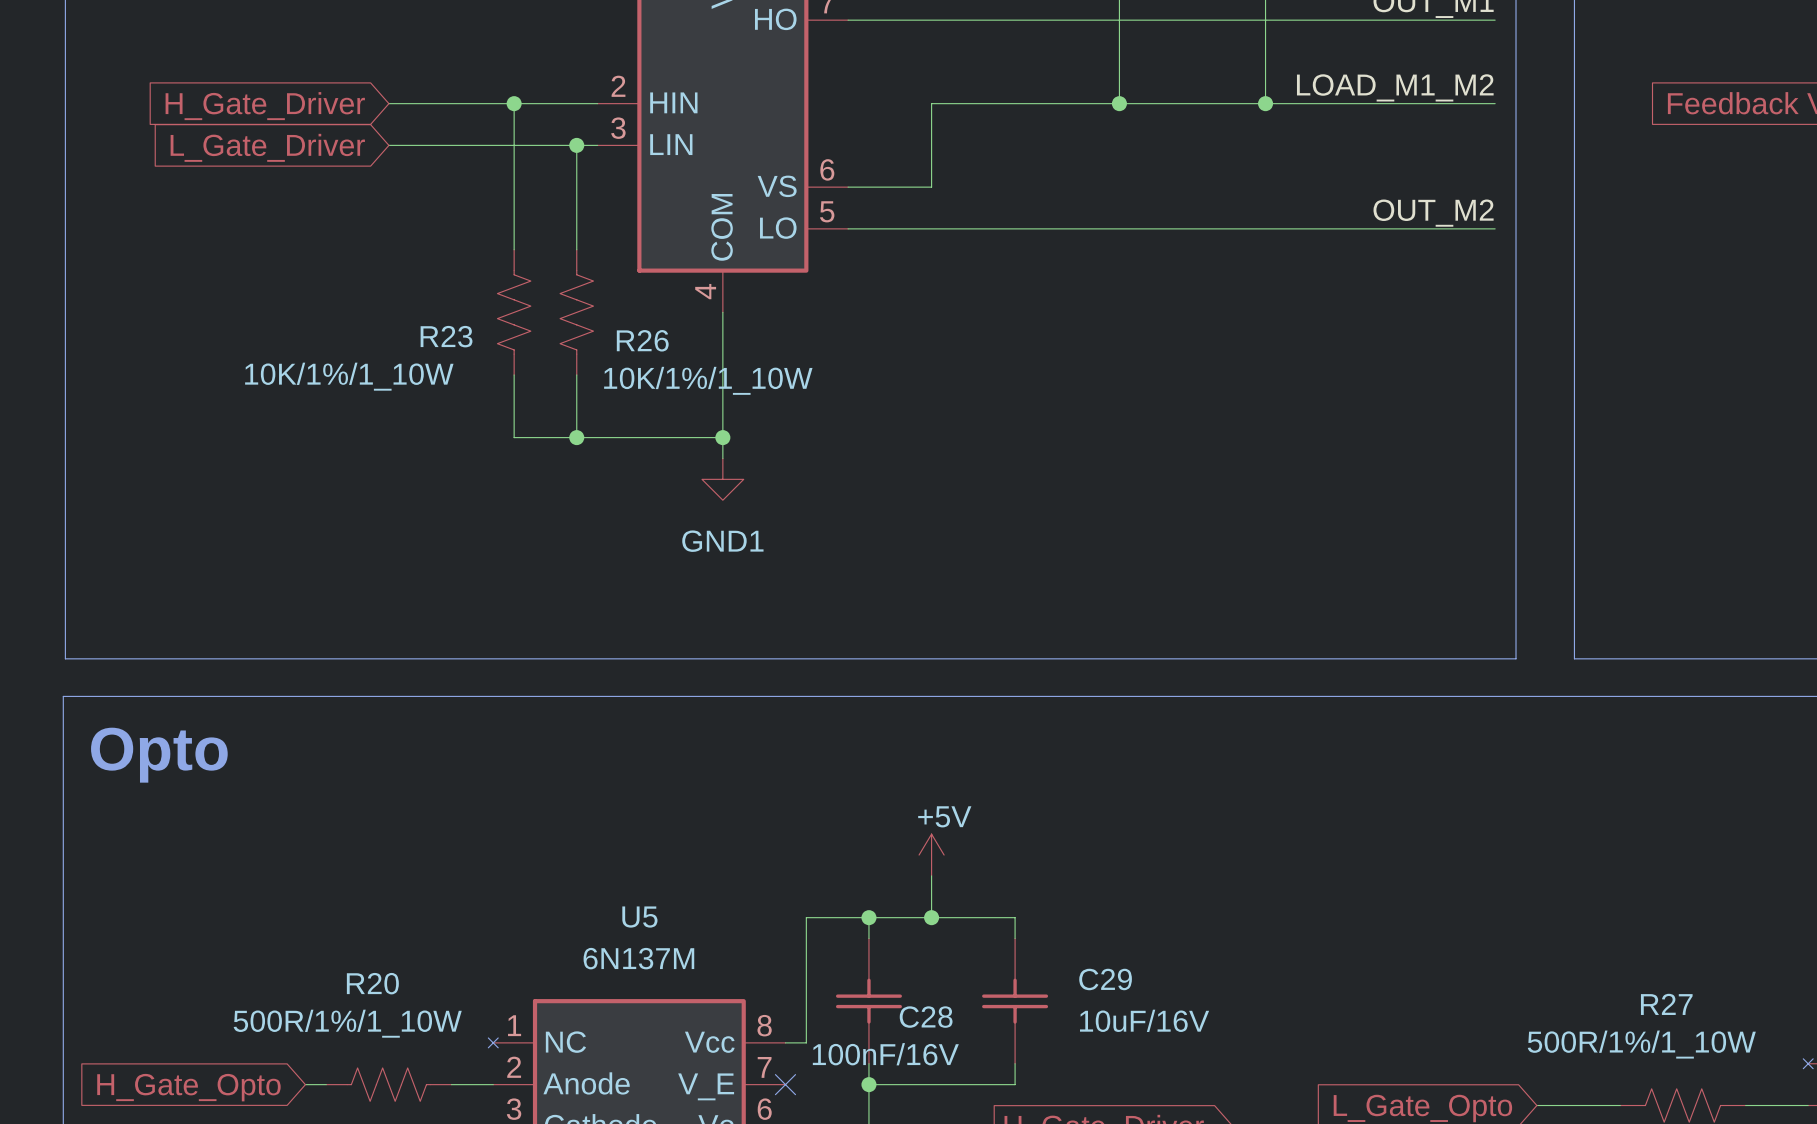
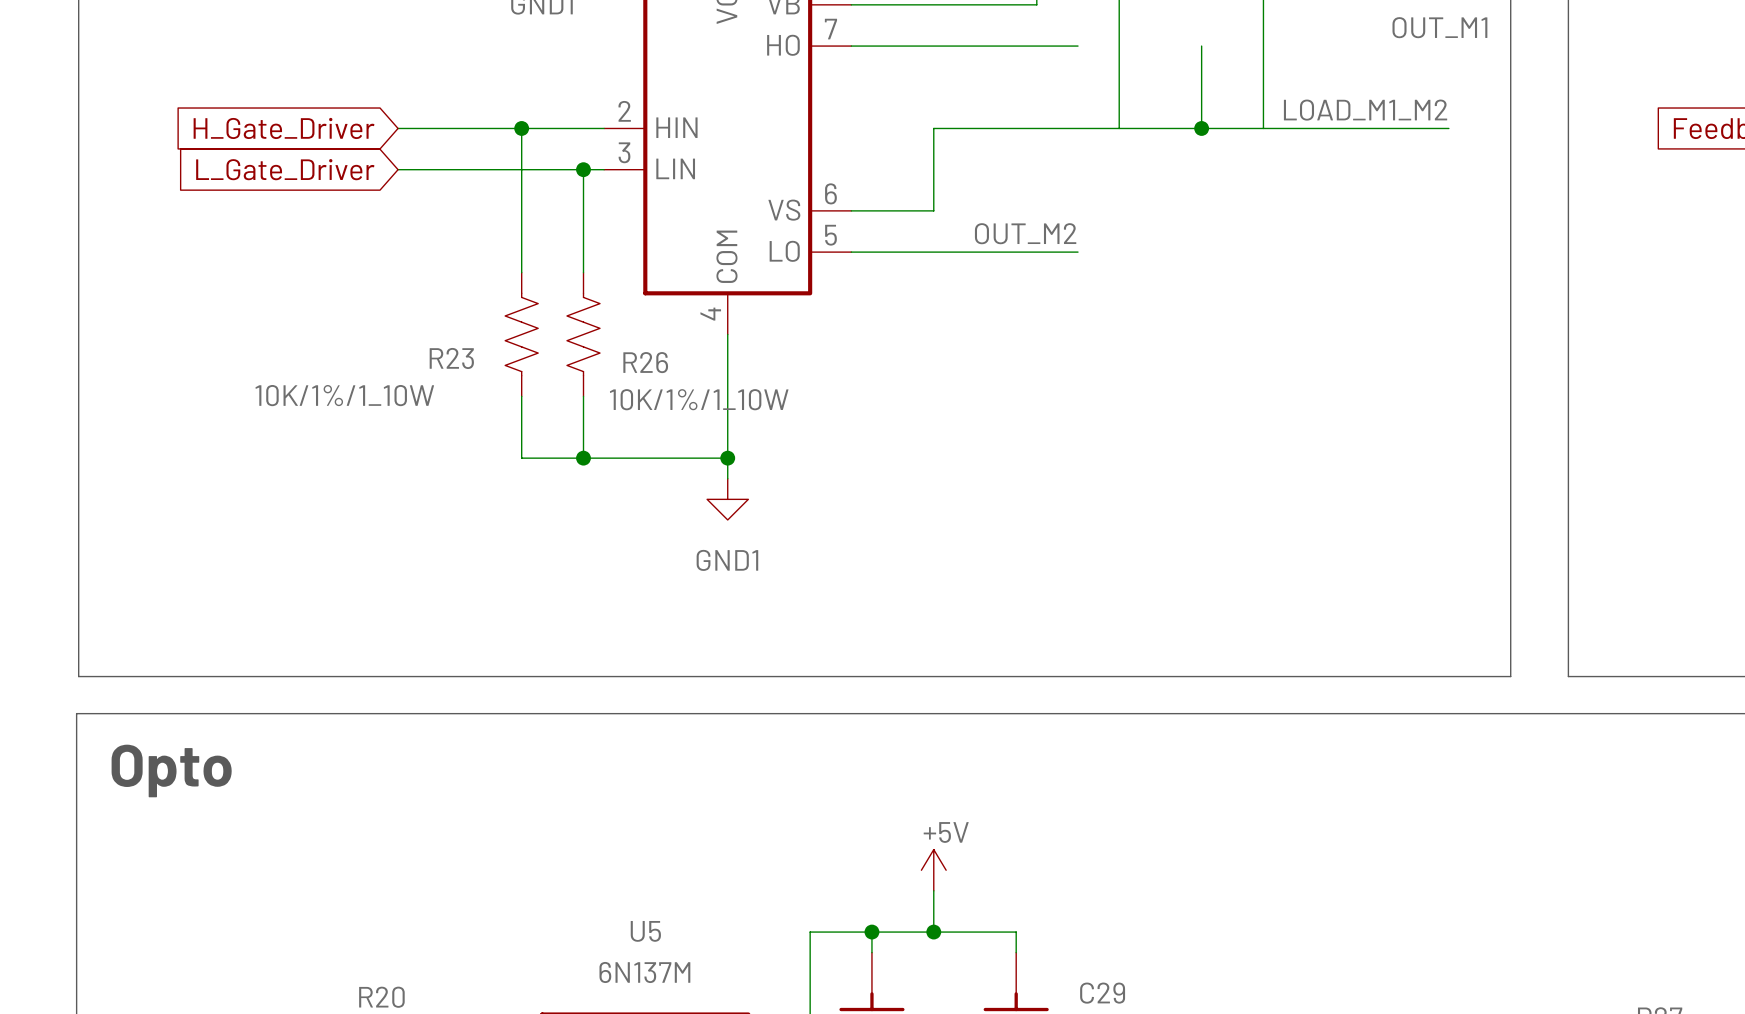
wire: (1077, 20) (1495, 20) -> none
wire: none -> (1201, 46) (1201, 128)
label position: LOAD_M1_M2 (1395, 87) -> LOAD_M1_M2 (1365, 110)
junction: (1119, 103) -> none
junction: none -> (1201, 128)
junction: (1265, 103) -> none
wire: (1453, 103) (1495, 103) -> none
label: none -> OUT_M2 (1025, 233)
label: OUT_M2 (1433, 213) -> none
wire: (1077, 228) (1495, 228) -> none

